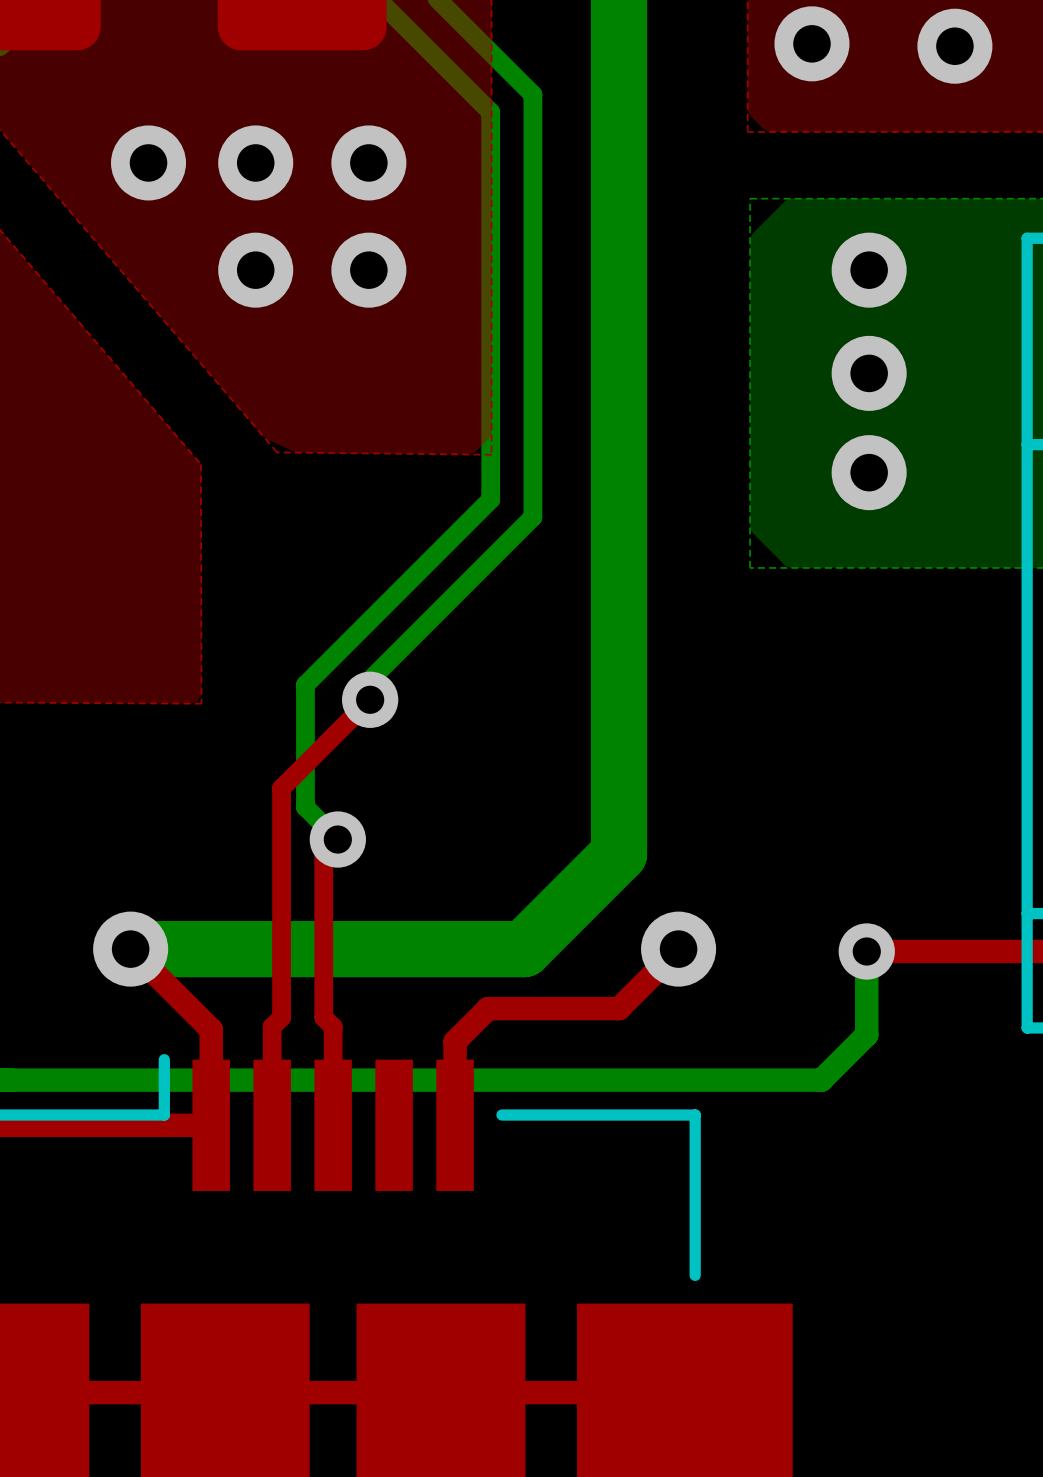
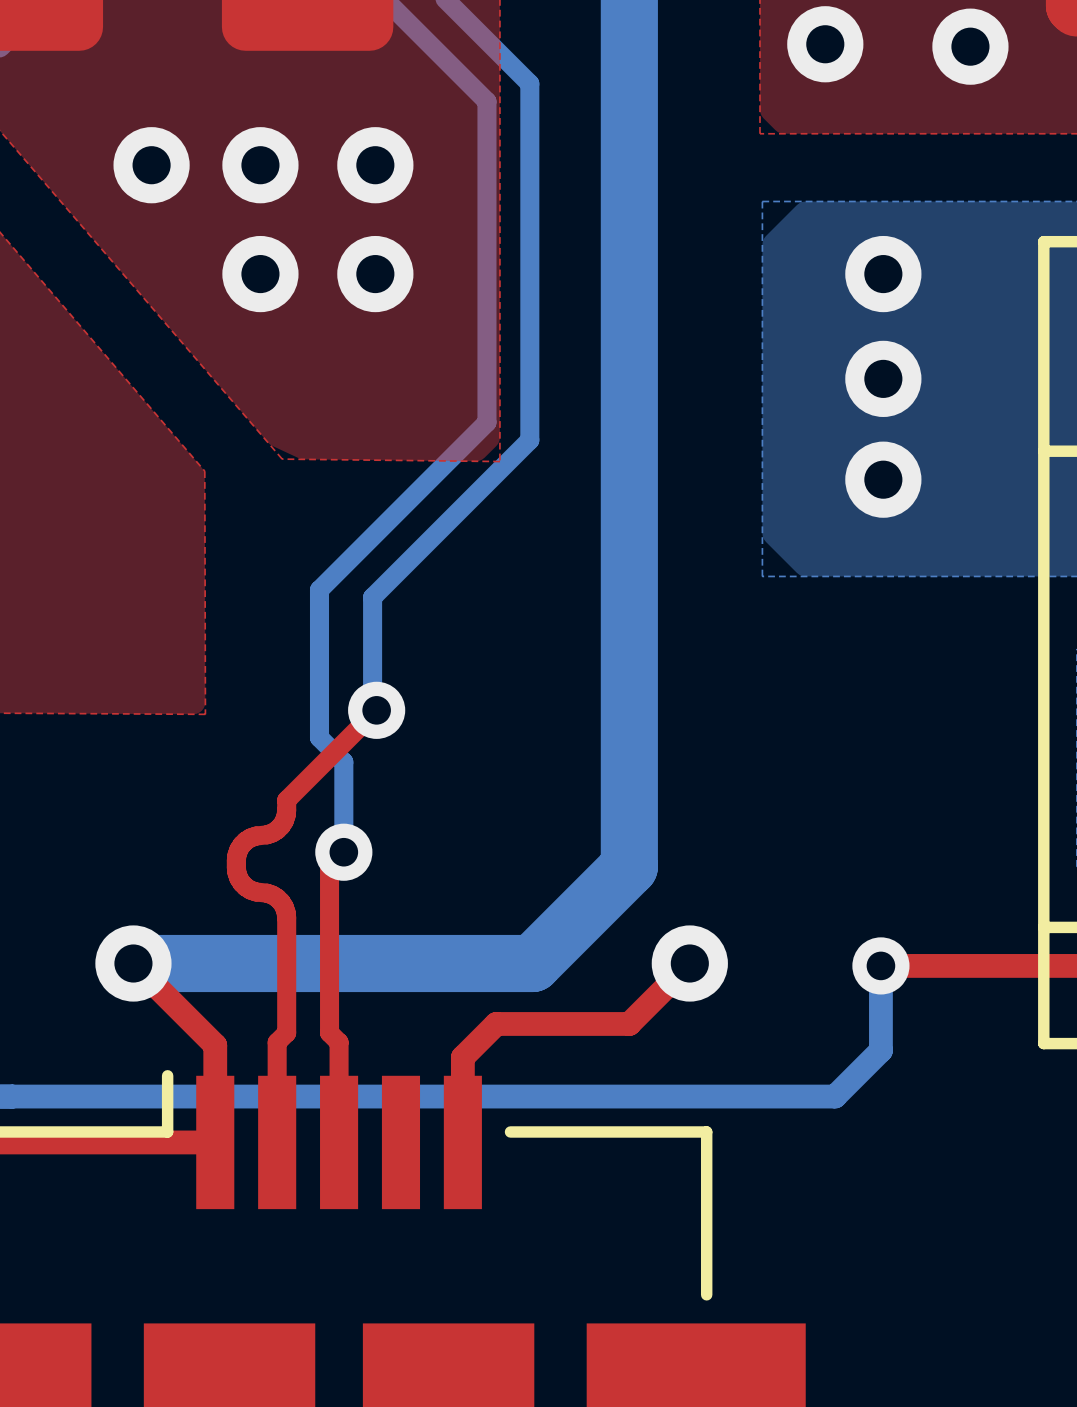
bottom track: (521, 82) (532, 94) (532, 517) (360, 689) -> (529, 83) (529, 440) (372, 597) (372, 708) (376, 710)
bottom track: (478, 100) (490, 112) (490, 499) (305, 684) (305, 807) (337, 839) -> (486, 101) (486, 422) (319, 589) (319, 737) (343, 762) (343, 852)
top track: (281, 798) (281, 904) -> (286, 810) (284, 821) (277, 829) (267, 834) (250, 837) (241, 844) (236, 860) (236, 873) (241, 883) (250, 890) (267, 893) (277, 898) (284, 906) (286, 917)

